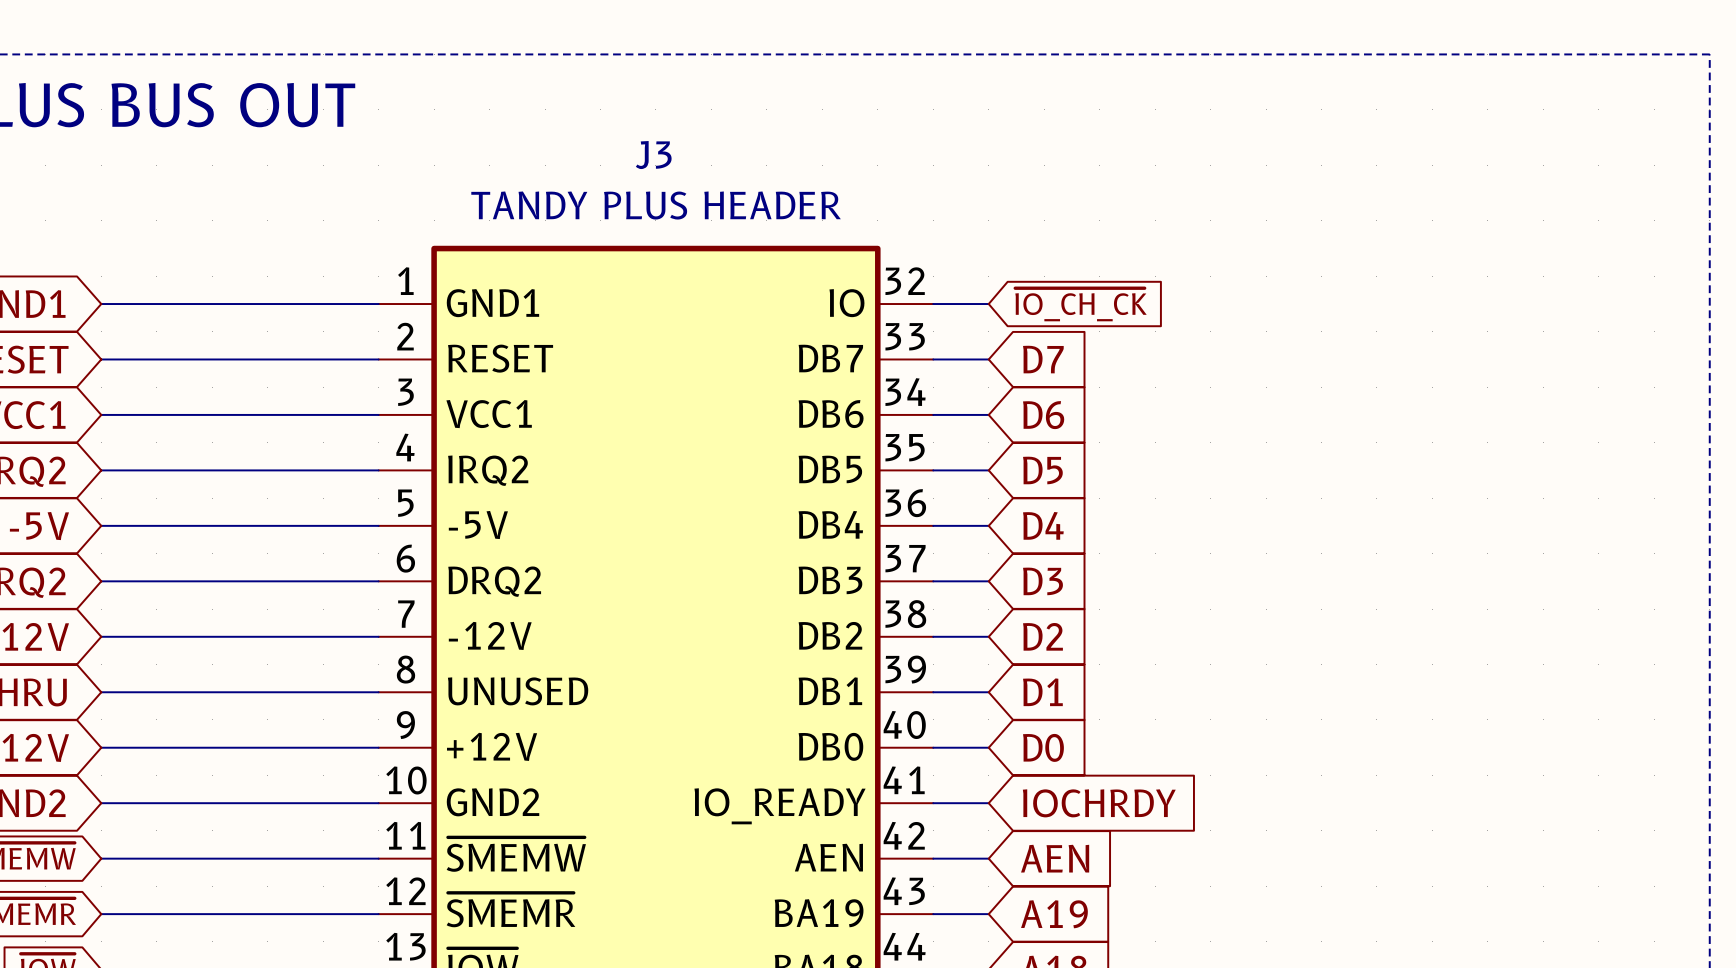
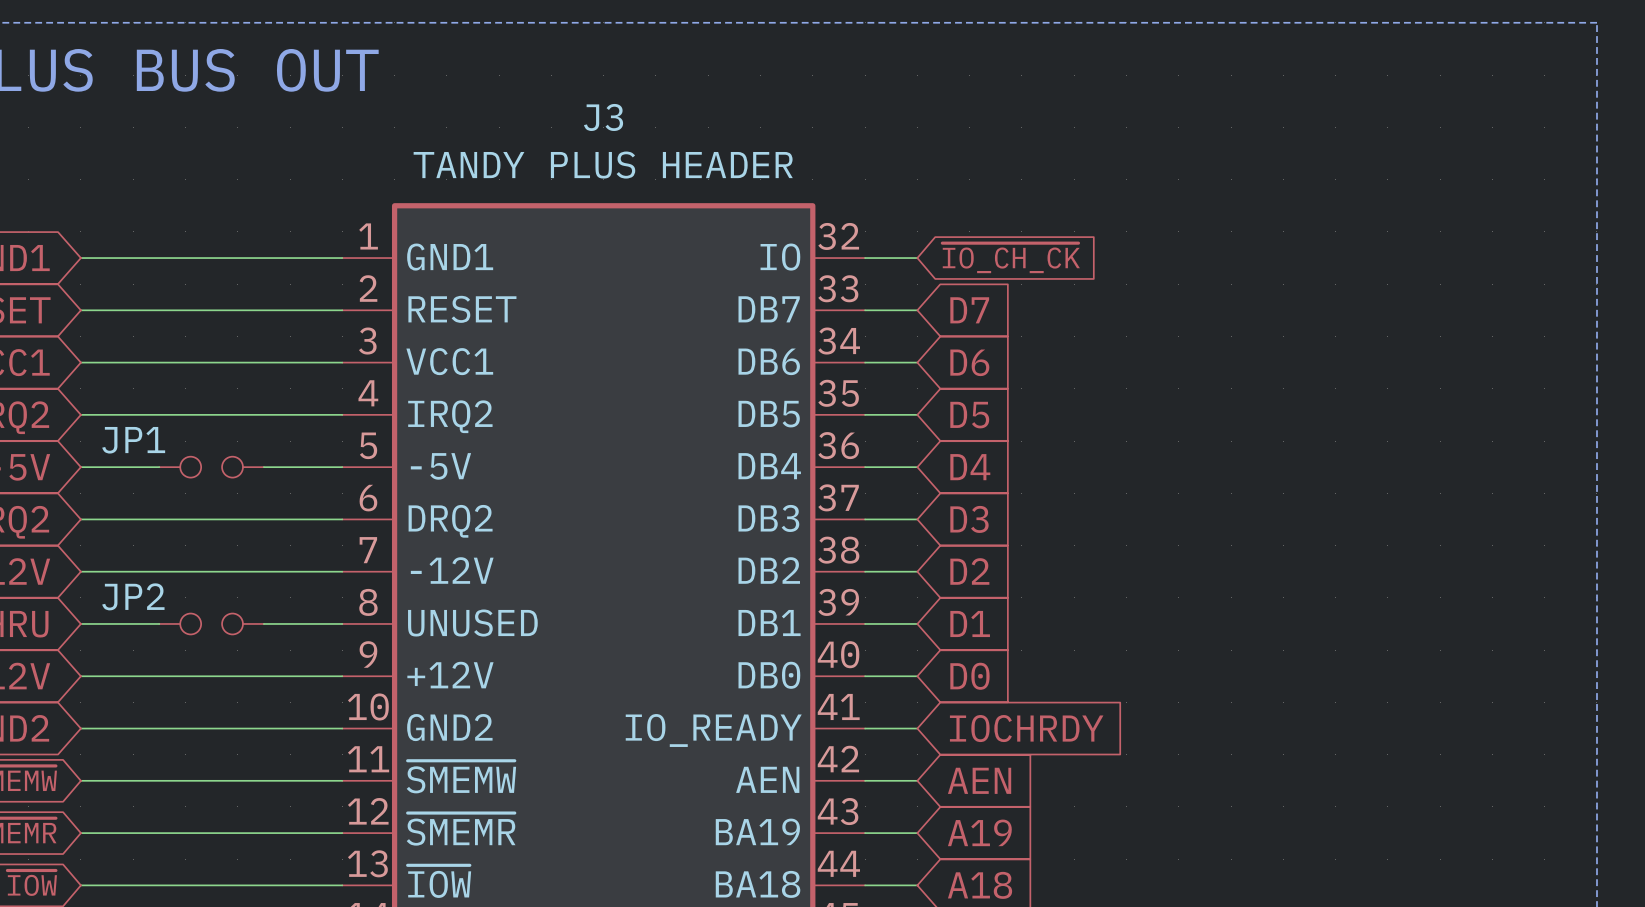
wire: (184, 525) (295, 525) -> none
JP1: none -> (211, 467)
wire: (184, 692) (295, 692) -> none
JP2: none -> (211, 623)

